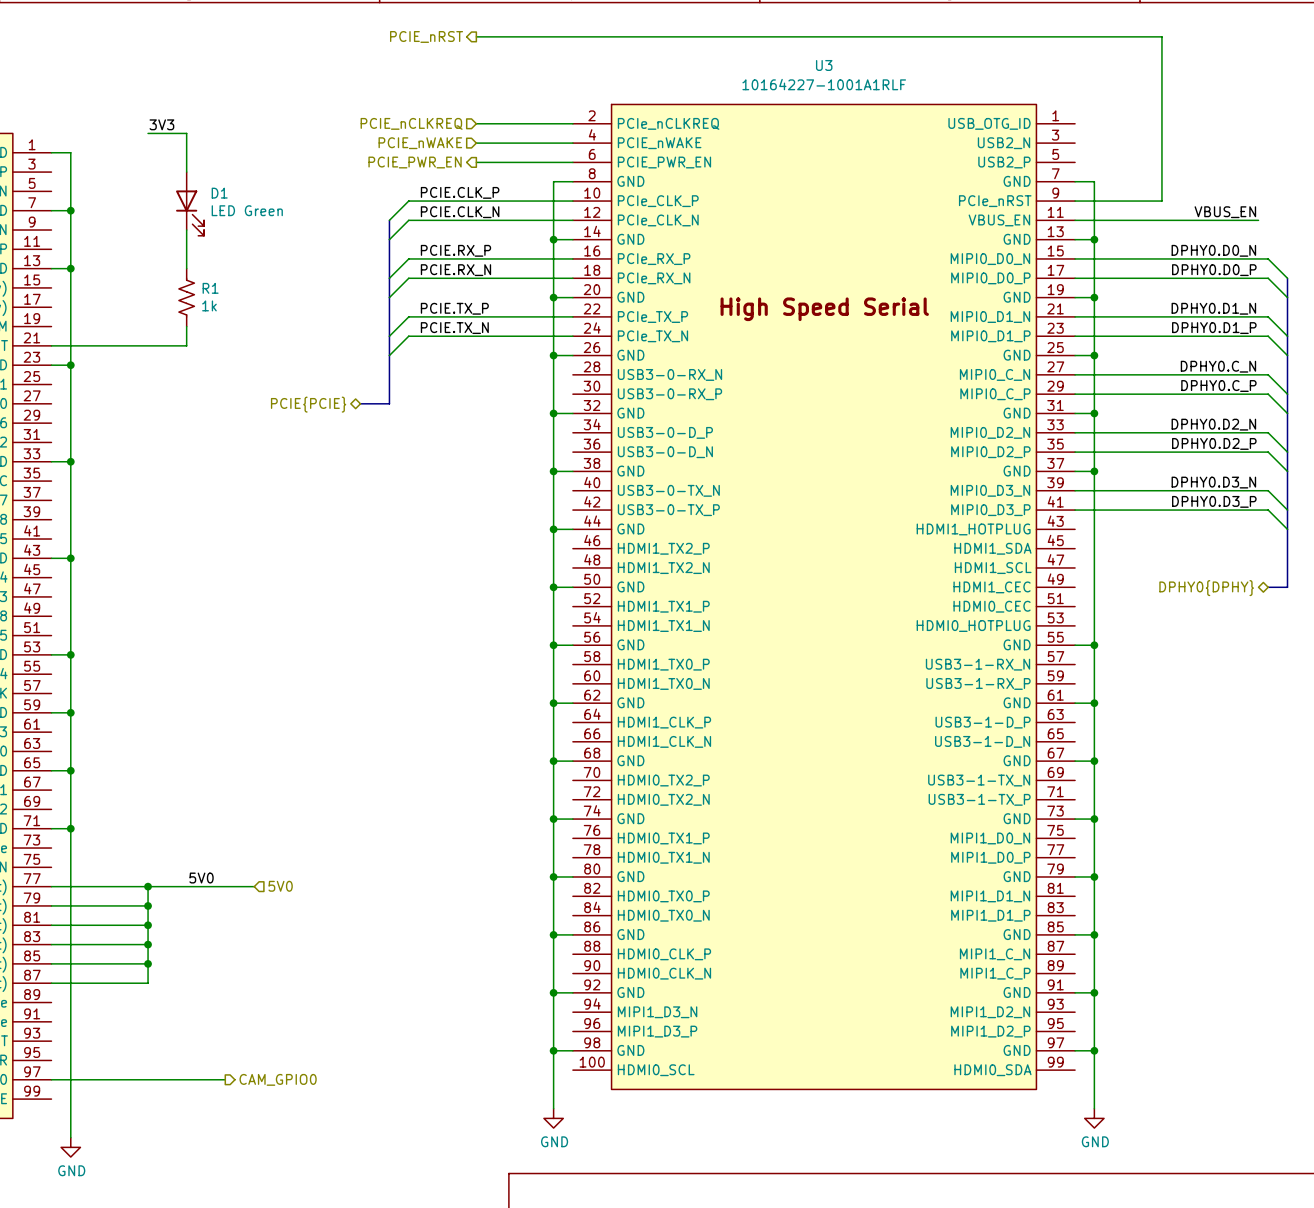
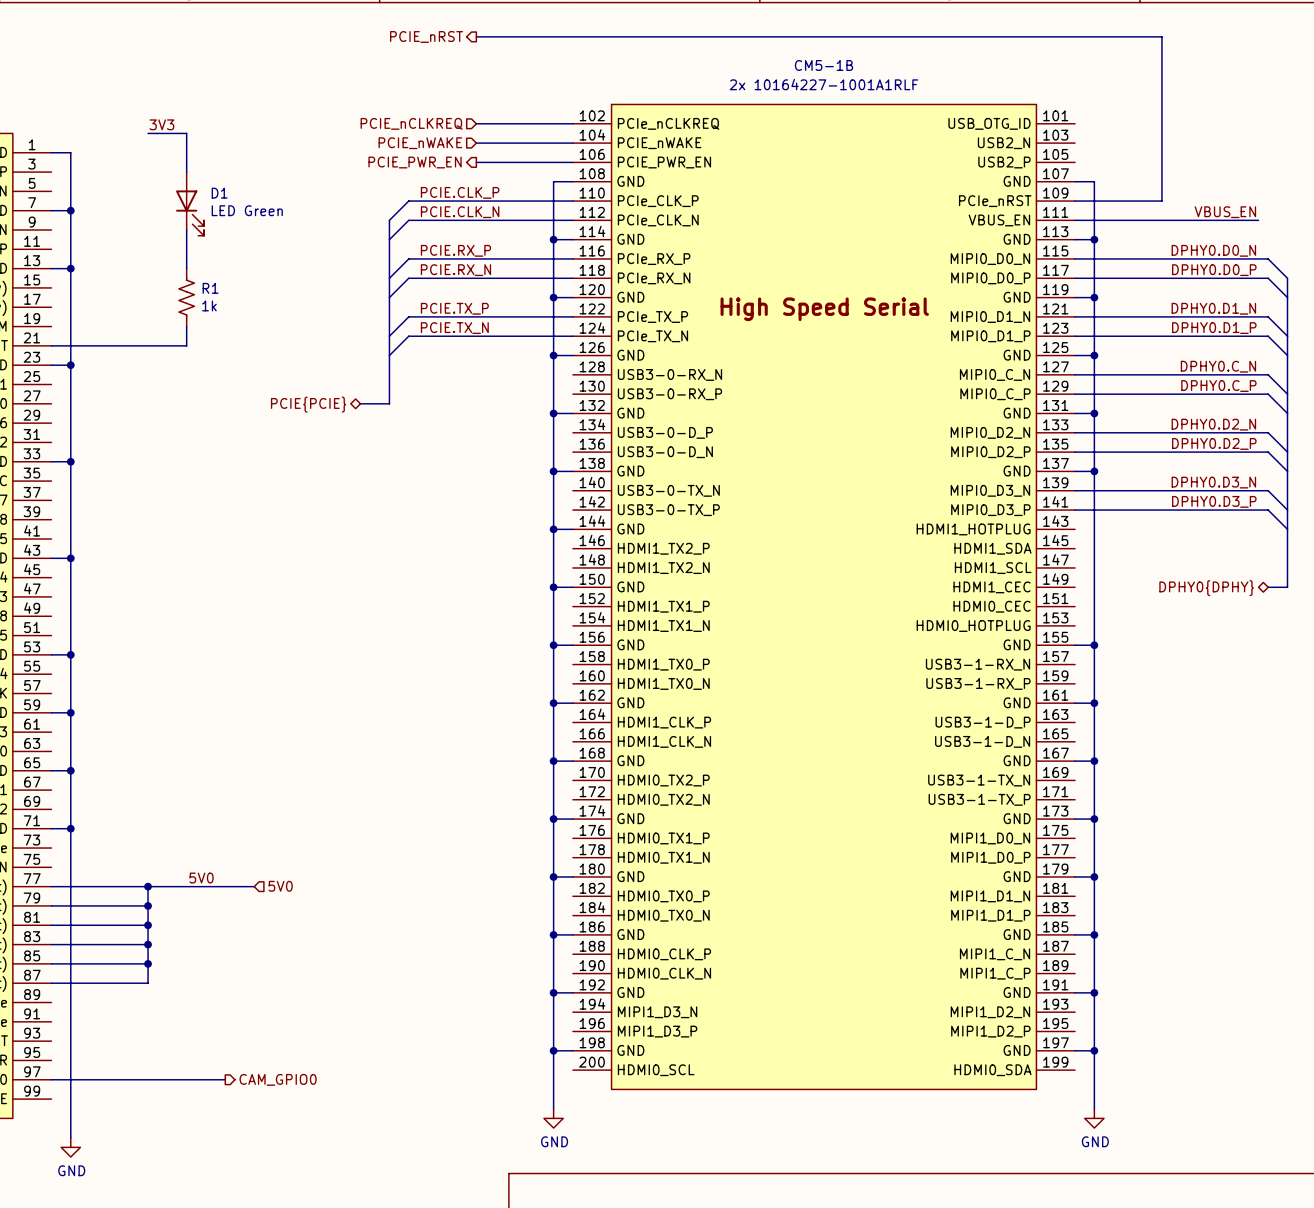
U3 name: U3 (824, 65) -> CM5-1B (823, 65)
U3 value: 10164227-1001A1RLF (824, 84) -> 2x 10164227-1001A1RLF (823, 84)
U3 symbol: [572, 104, 1076, 1090] -> [572, 104, 1076, 1090]

